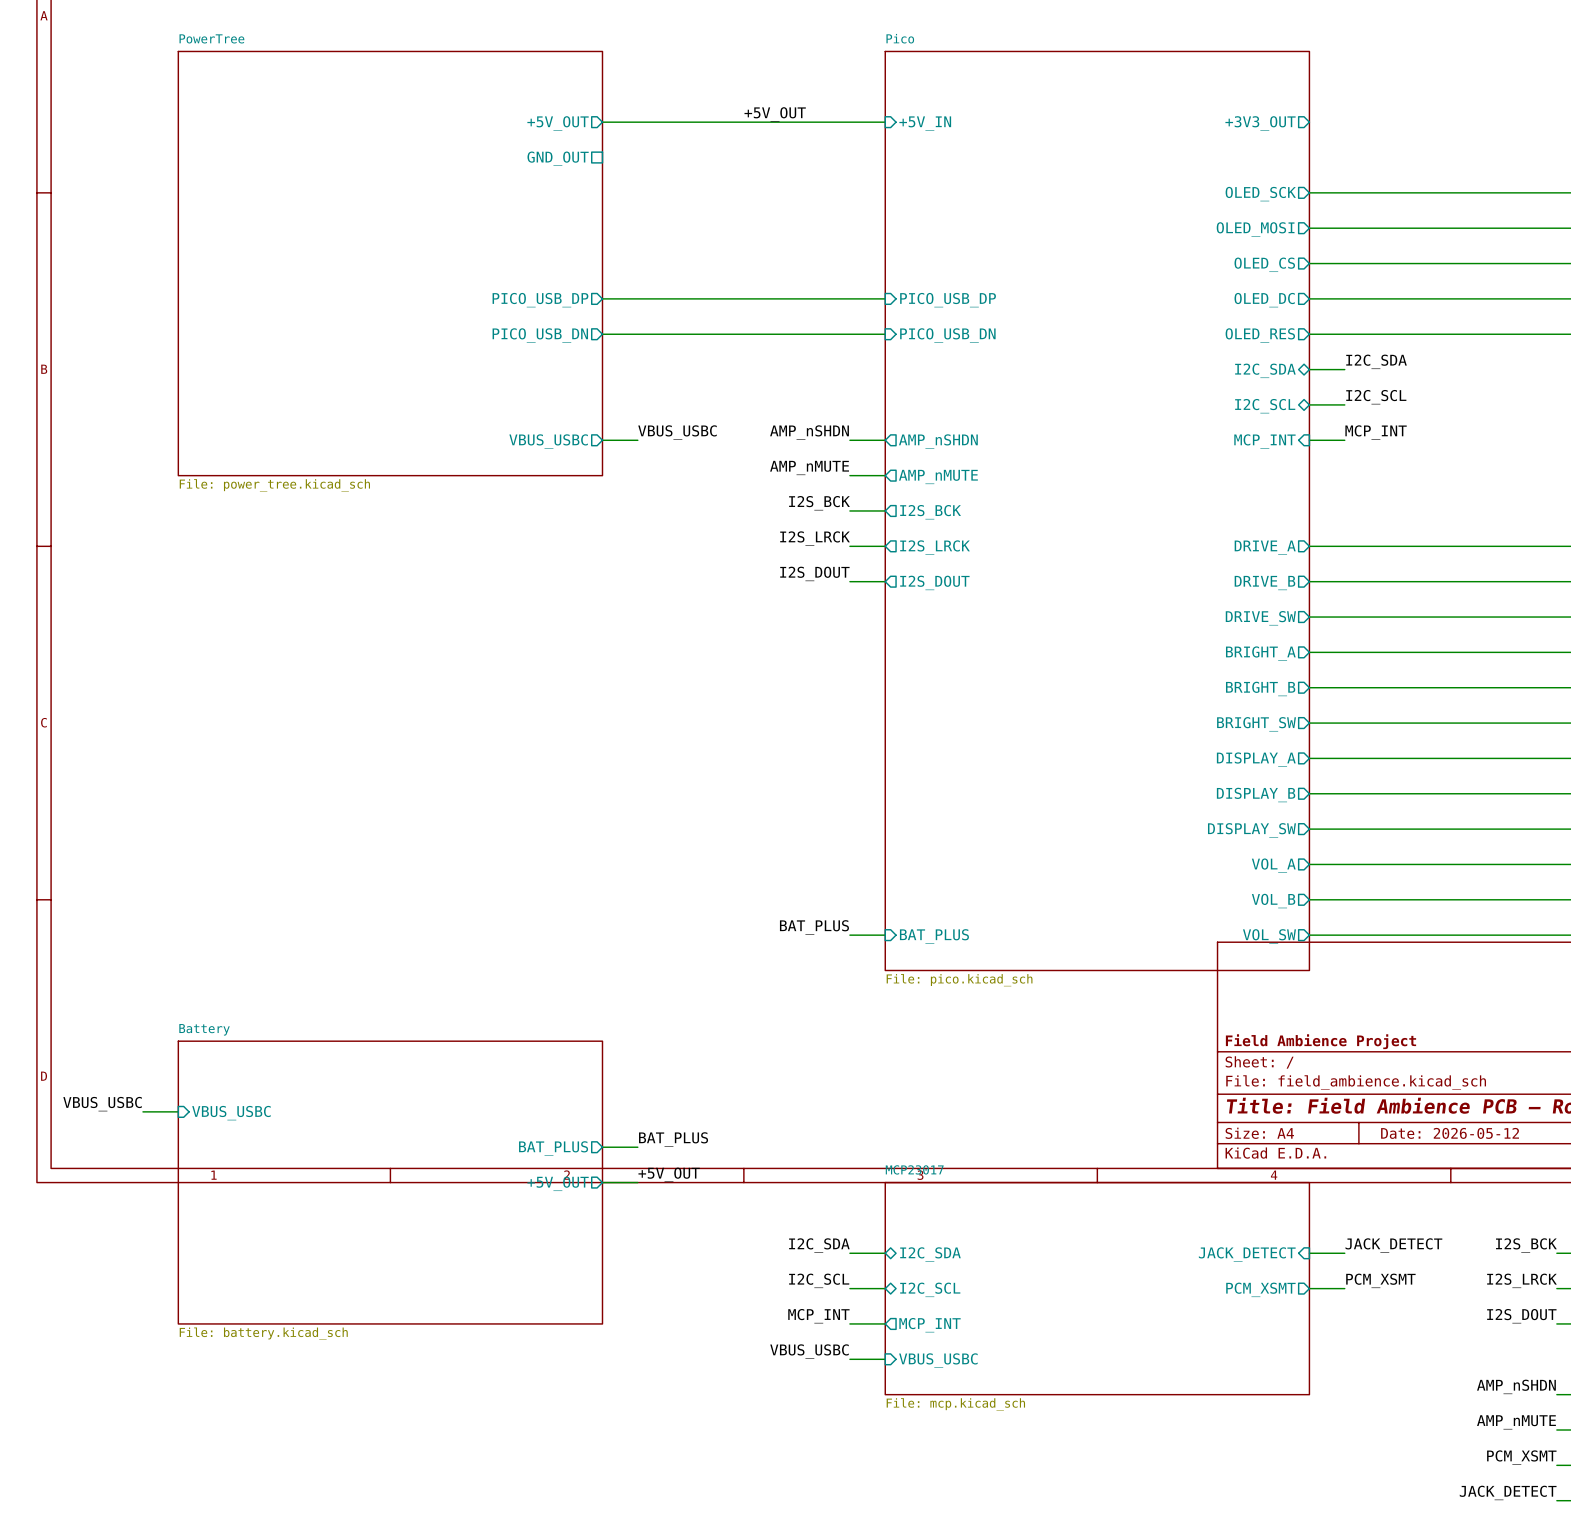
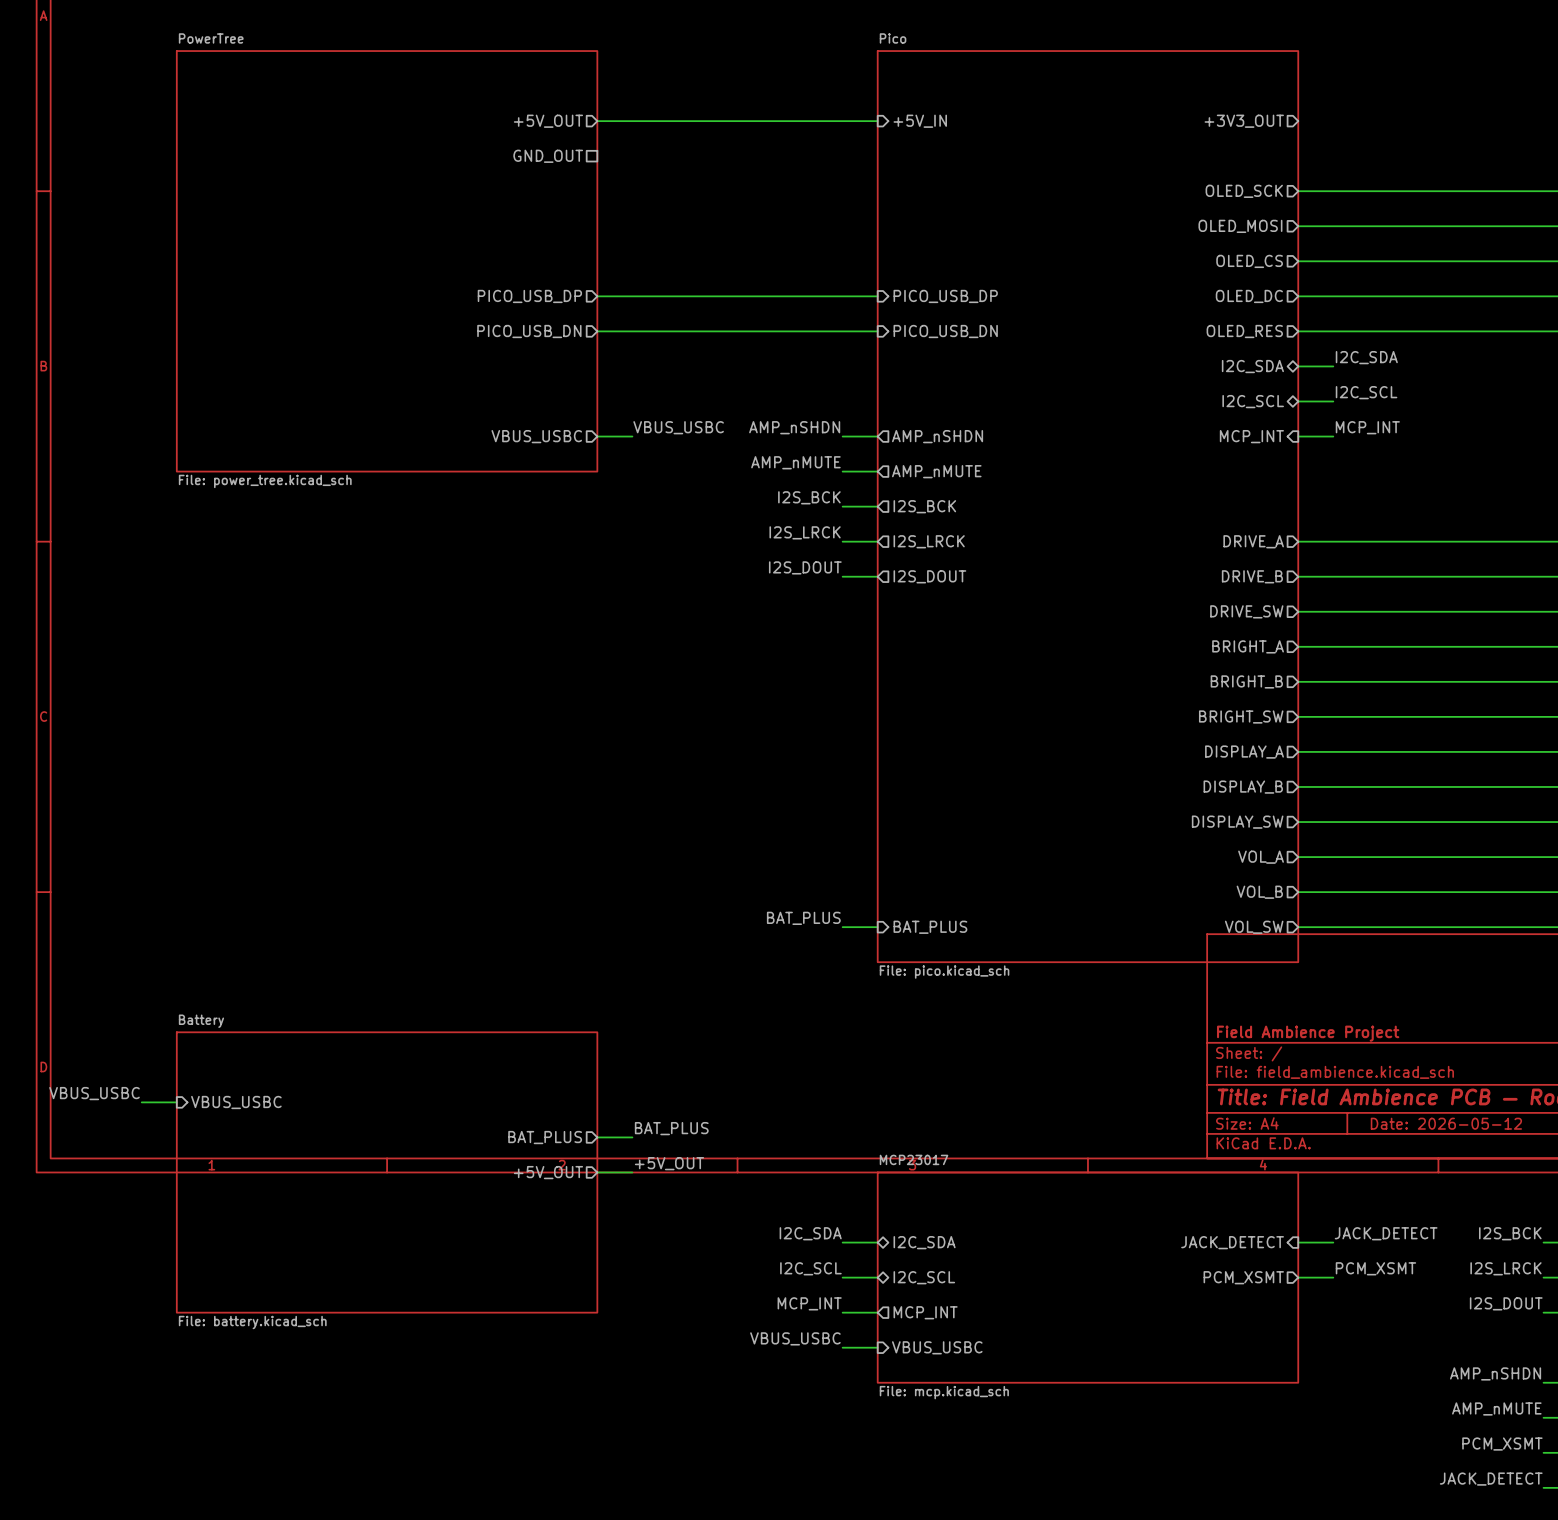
label: +5V_OUT (775, 114) -> none

